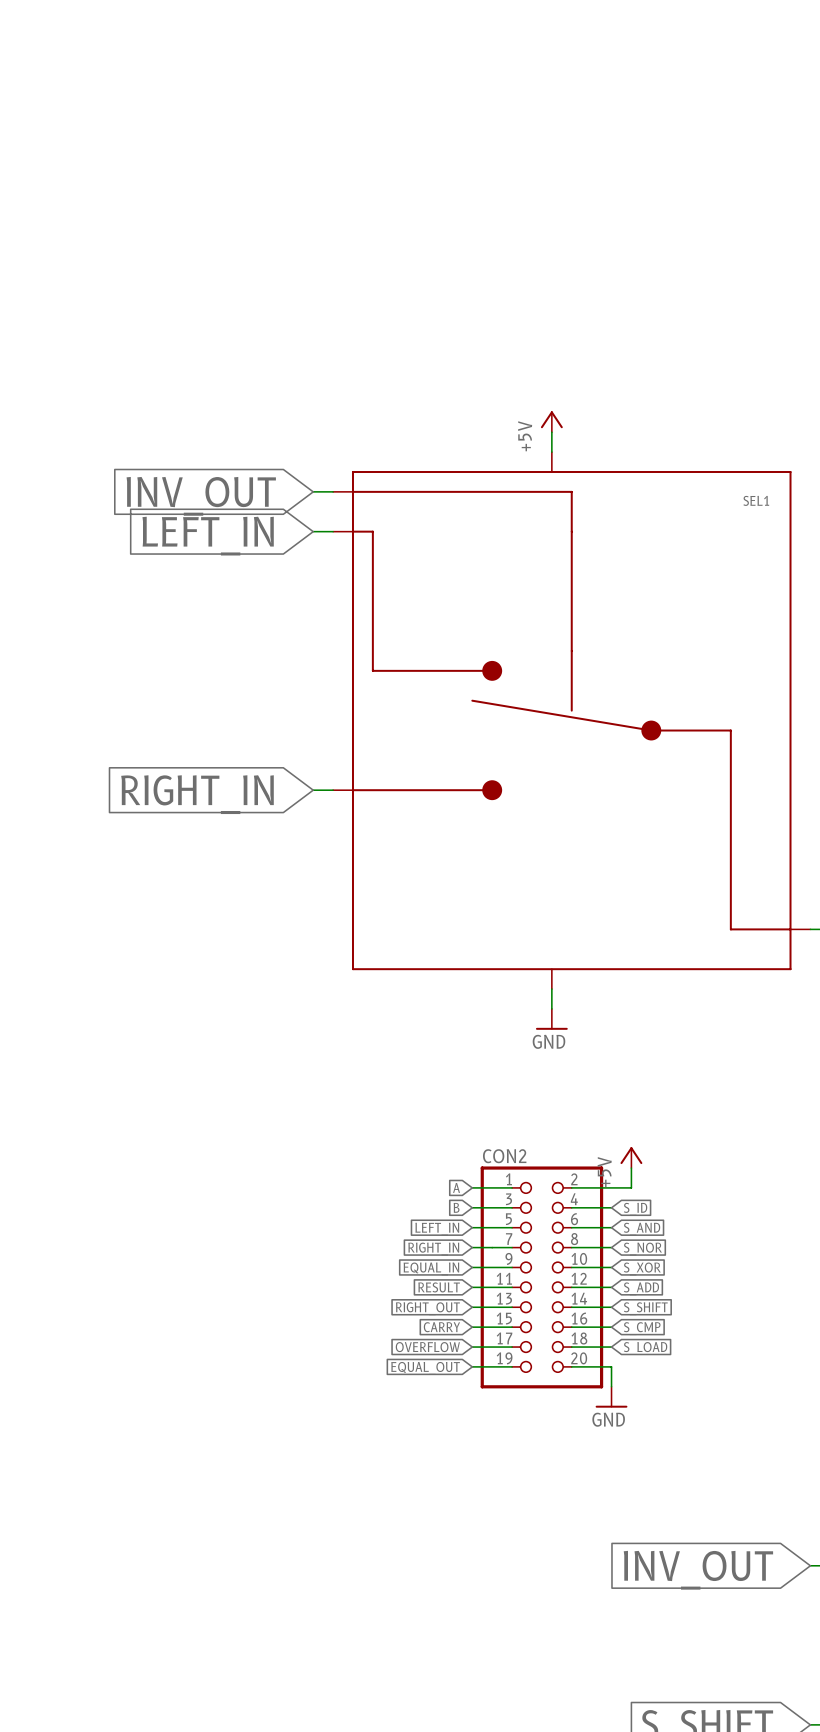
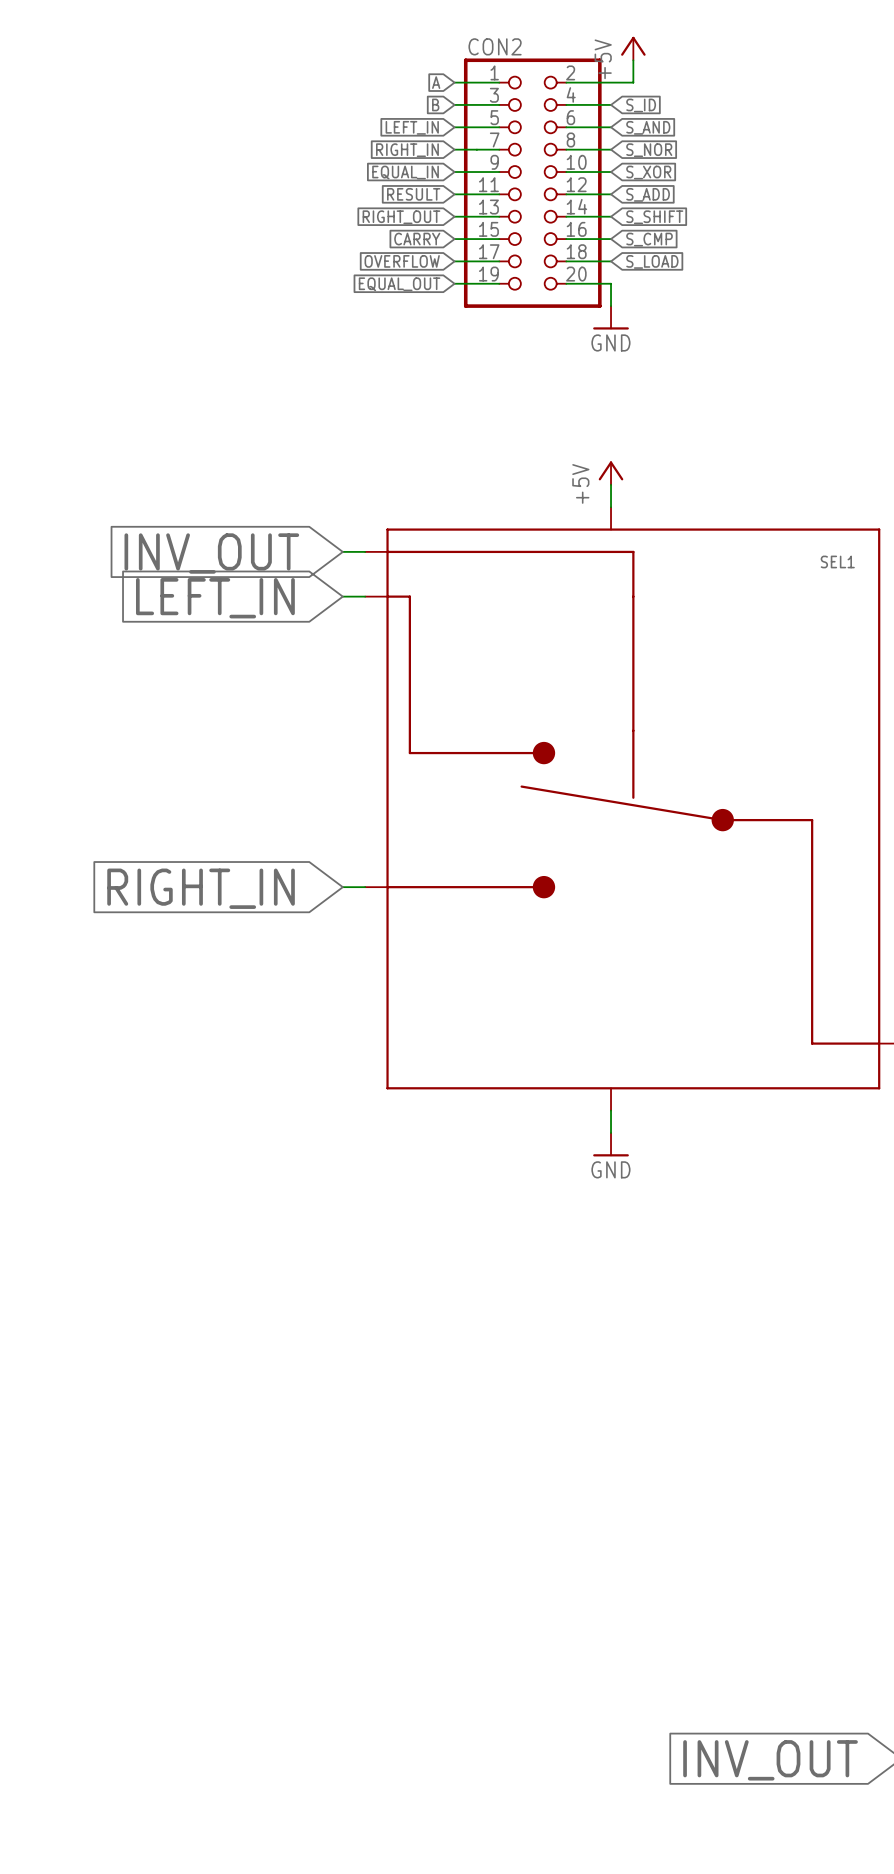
power symbol: none -> +5V (633, 48)
wire: none -> (633, 60) (633, 82) (566, 82)
global label: none -> A (436, 82)
wire: none -> (454, 82) (499, 82)
global label: none -> B (435, 104)
wire: none -> (454, 104) (499, 104)
wire: none -> (566, 104) (611, 104)
global label: none -> S_ID (641, 105)
wire: none -> (454, 127) (499, 127)
wire: none -> (566, 127) (611, 127)
global label: none -> LEFT_IN (412, 127)
global label: none -> S_AND (648, 127)
wire: none -> (454, 149) (499, 149)
wire: none -> (566, 149) (611, 149)
global label: none -> RIGHT_IN (407, 150)
global label: none -> S_NOR (649, 150)
wire: none -> (454, 172) (499, 172)
wire: none -> (566, 172) (611, 172)
global label: none -> EQUAL_IN (405, 172)
global label: none -> S_XOR (648, 172)
global label: none -> RESULT (413, 194)
wire: none -> (454, 194) (499, 194)
wire: none -> (566, 194) (611, 194)
global label: none -> S_ADD (648, 194)
wire: none -> (454, 216) (499, 216)
wire: none -> (566, 216) (611, 216)
global label: none -> RIGHT_OUT (401, 217)
global label: none -> S_SHIFT (654, 217)
global label: none -> CARRY (417, 239)
wire: none -> (454, 239) (499, 239)
wire: none -> (566, 239) (611, 239)
global label: none -> S_CMP (649, 239)
global label: none -> OVERFLOW (402, 261)
wire: none -> (454, 261) (499, 261)
wire: none -> (566, 261) (611, 261)
global label: none -> S_LOAD (652, 261)
wire: none -> (454, 283) (499, 283)
wire: none -> (566, 283) (611, 283) (611, 306)
global label: none -> EQUAL_OUT (399, 284)
power symbol: none -> GND (611, 317)
power symbol: +5V (631, 1157) -> none
wire: (631, 1168) (631, 1187) (571, 1187) -> none
global label: A (456, 1187) -> none
wire: (472, 1187) (512, 1187) -> none
global label: B (456, 1207) -> none
wire: (472, 1207) (512, 1207) -> none
wire: (571, 1207) (611, 1207) -> none
global label: S_ID (635, 1209) -> none
wire: (472, 1227) (512, 1227) -> none
wire: (571, 1227) (611, 1227) -> none
global label: LEFT_IN (437, 1229) -> none
global label: S_AND (642, 1229) -> none
wire: (472, 1247) (512, 1247) -> none
wire: (571, 1247) (611, 1247) -> none
global label: RIGHT_IN (433, 1249) -> none
global label: S_NOR (642, 1249) -> none
wire: (472, 1267) (512, 1267) -> none
wire: (571, 1267) (611, 1267) -> none
global label: EQUAL_IN (431, 1268) -> none
global label: S_XOR (642, 1268) -> none
CON2 position: (541, 1277) -> (532, 183)
global label: RESULT (439, 1287) -> none
wire: (472, 1287) (512, 1287) -> none
wire: (571, 1287) (611, 1287) -> none
global label: S_ADD (641, 1288) -> none
wire: (472, 1307) (512, 1307) -> none
wire: (571, 1307) (611, 1307) -> none
global label: RIGHT_OUT (427, 1308) -> none
global label: S_SHIFT (645, 1308) -> none
global label: CARRY (441, 1327) -> none
wire: (472, 1327) (512, 1327) -> none
wire: (571, 1327) (611, 1327) -> none
global label: S_CMP (642, 1328) -> none
global label: OVERFLOW (427, 1347) -> none
wire: (472, 1347) (512, 1347) -> none
wire: (571, 1347) (611, 1347) -> none
global label: S_LOAD (645, 1348) -> none
wire: (472, 1366) (512, 1366) -> none
wire: (571, 1366) (611, 1366) (611, 1386) -> none
global label: EQUAL_OUT (425, 1368) -> none
power symbol: GND (611, 1397) -> none

